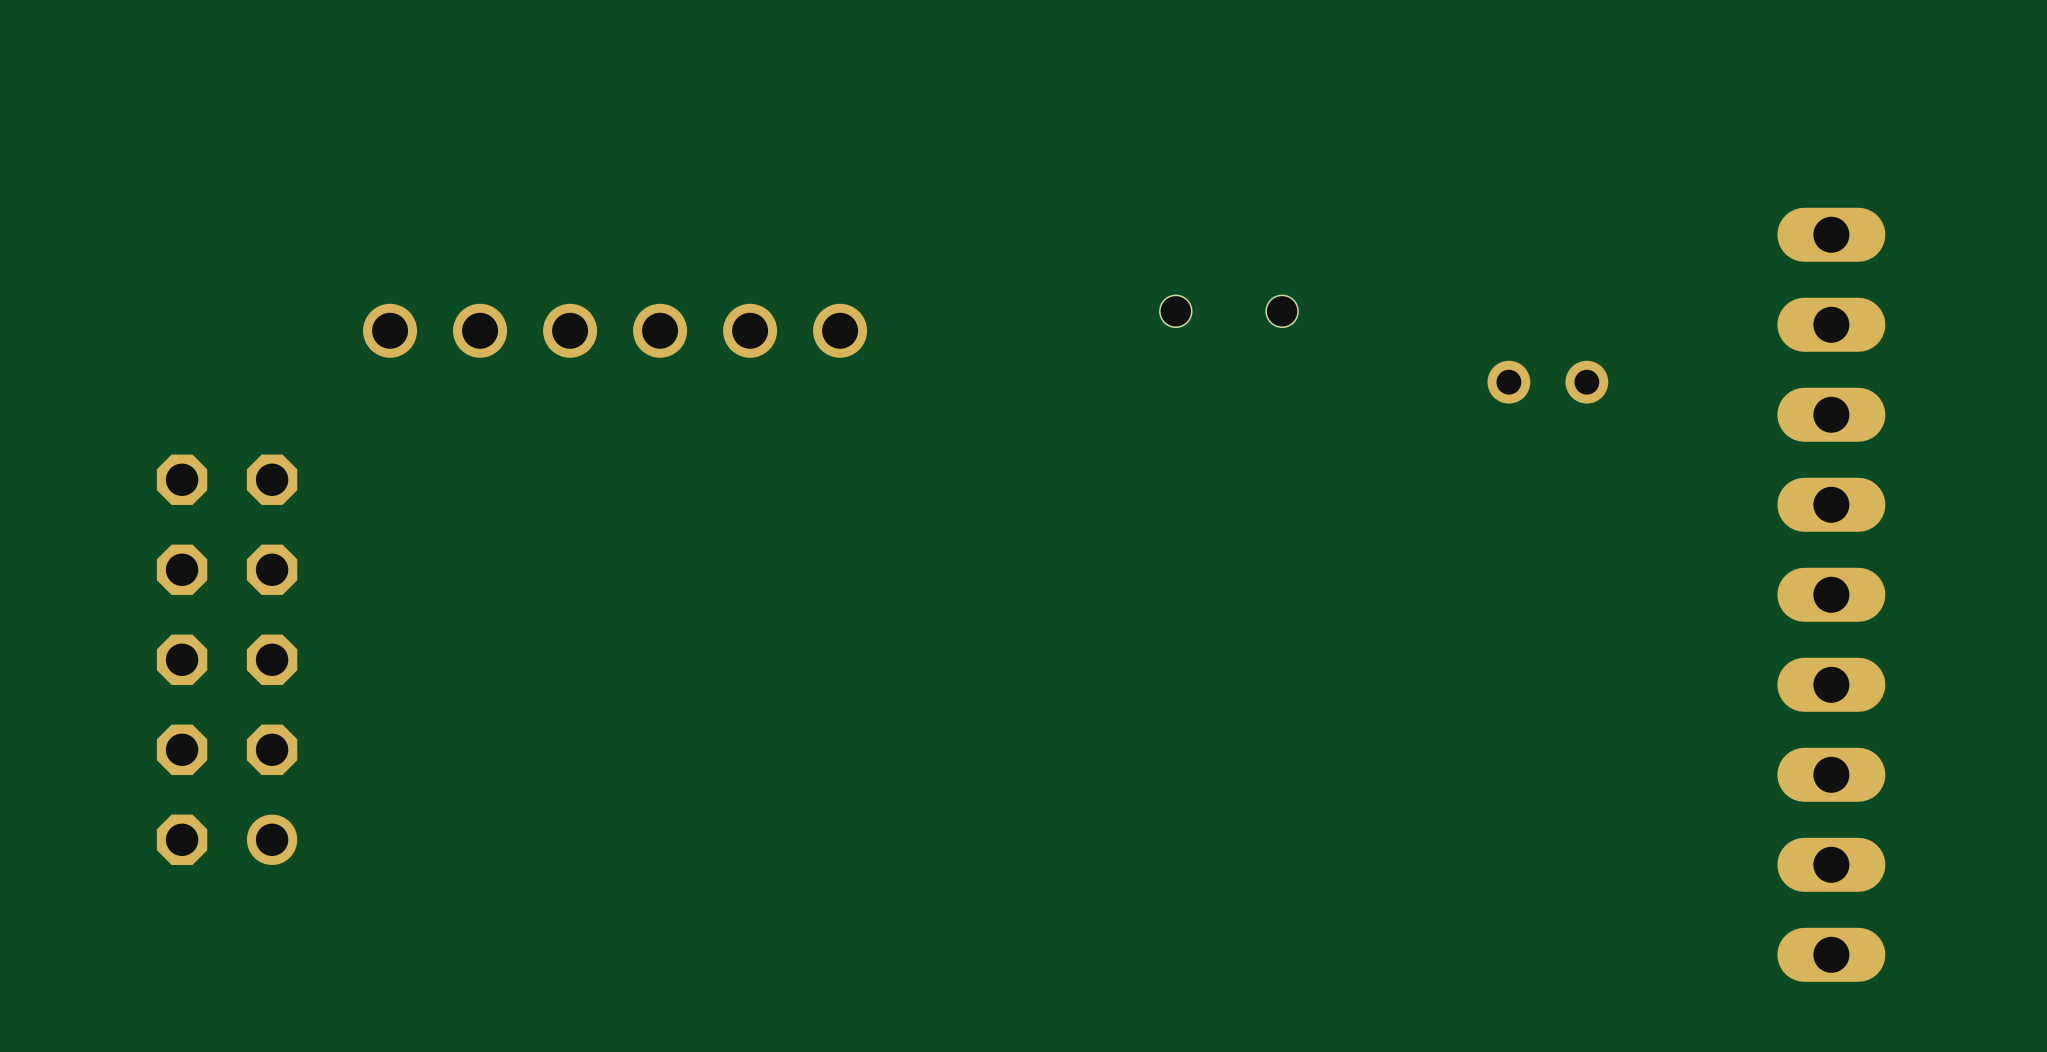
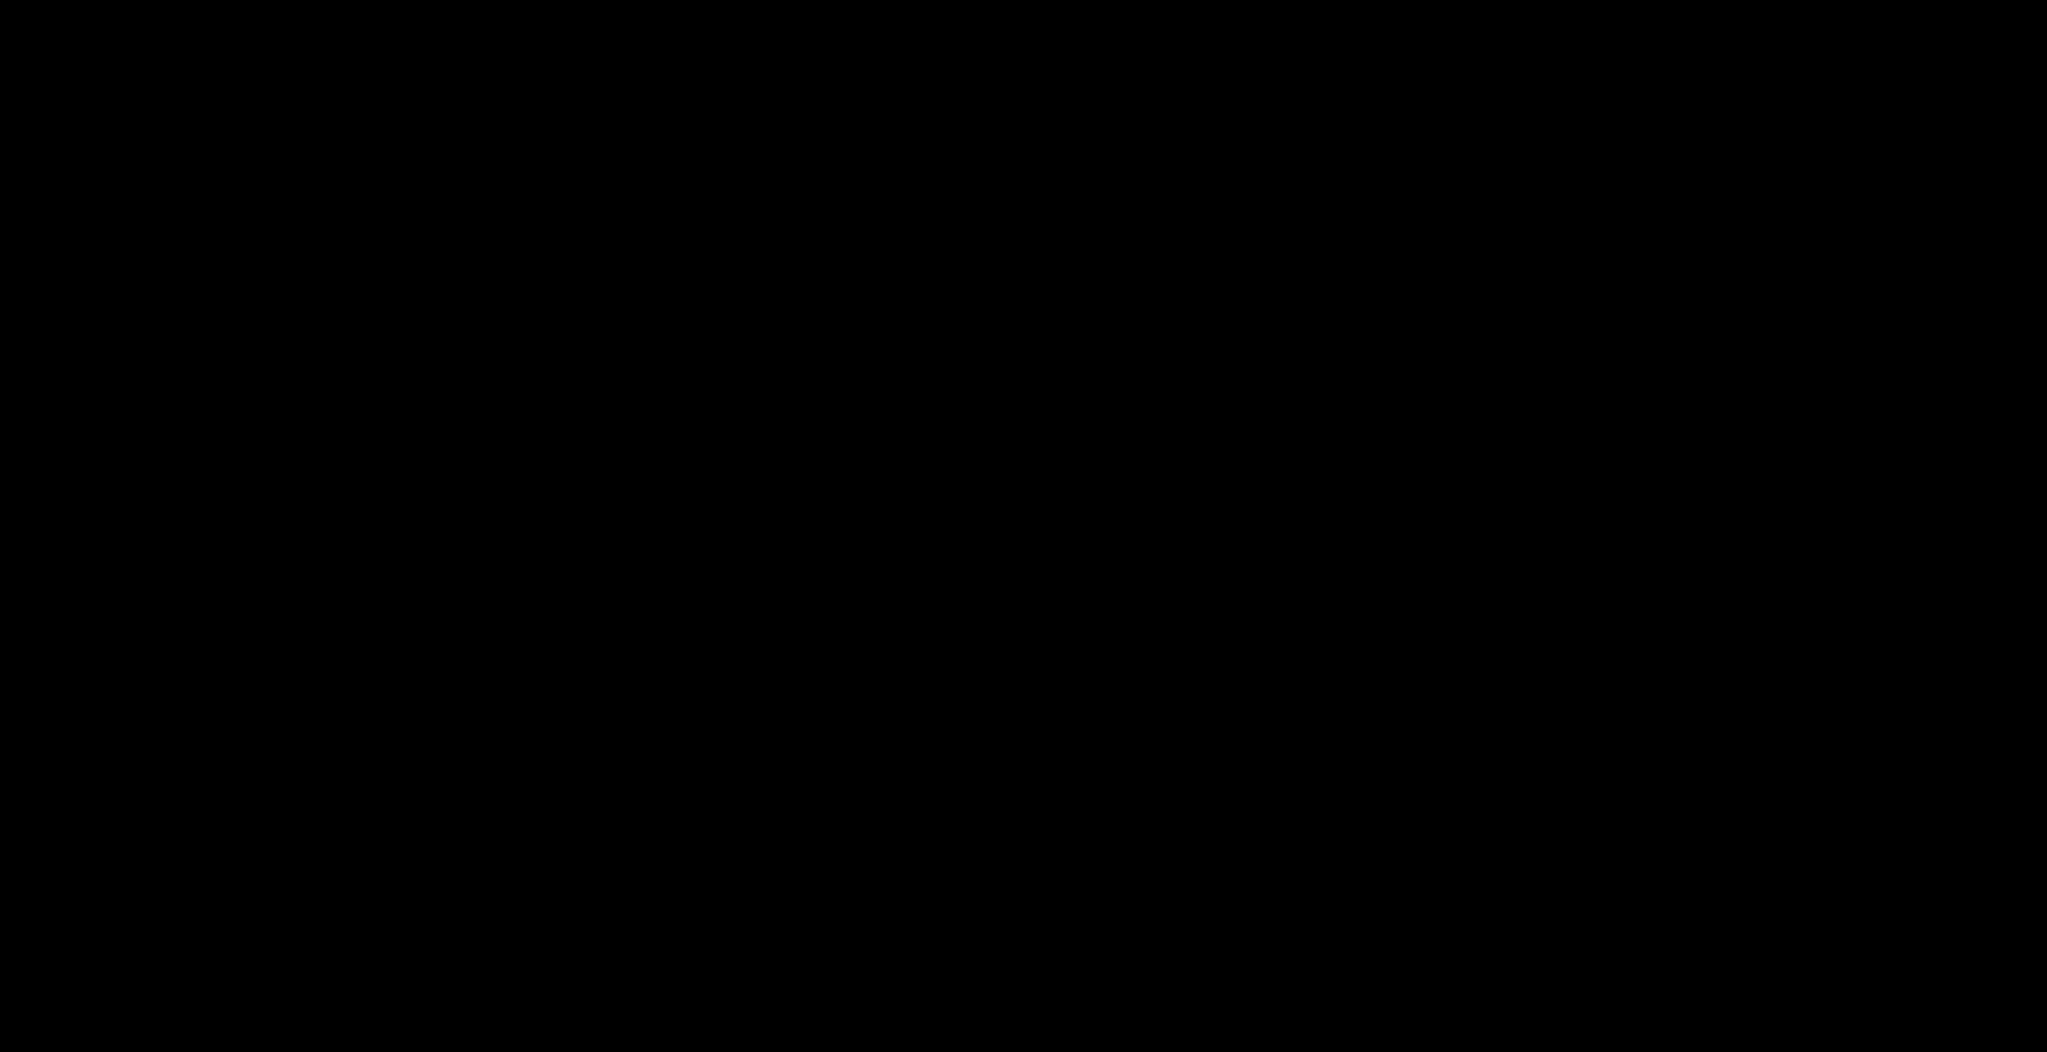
part: (1228, 311) -> none
part: (615, 330) -> none
part: (1547, 382) -> none
part: (1831, 594) -> none
part: (227, 659) -> none

